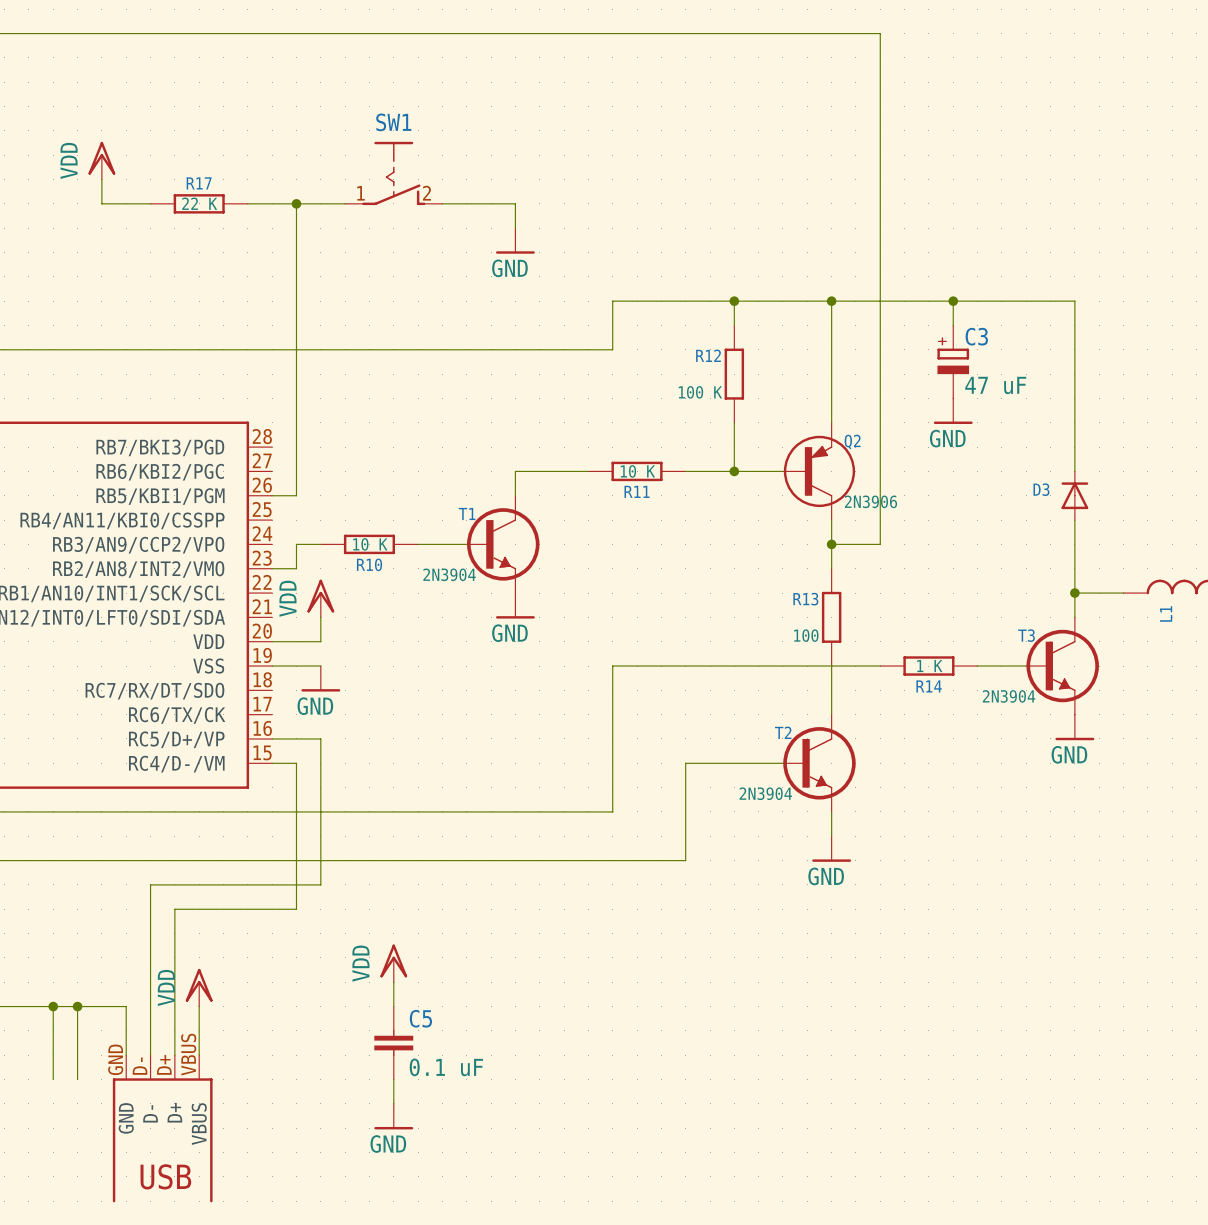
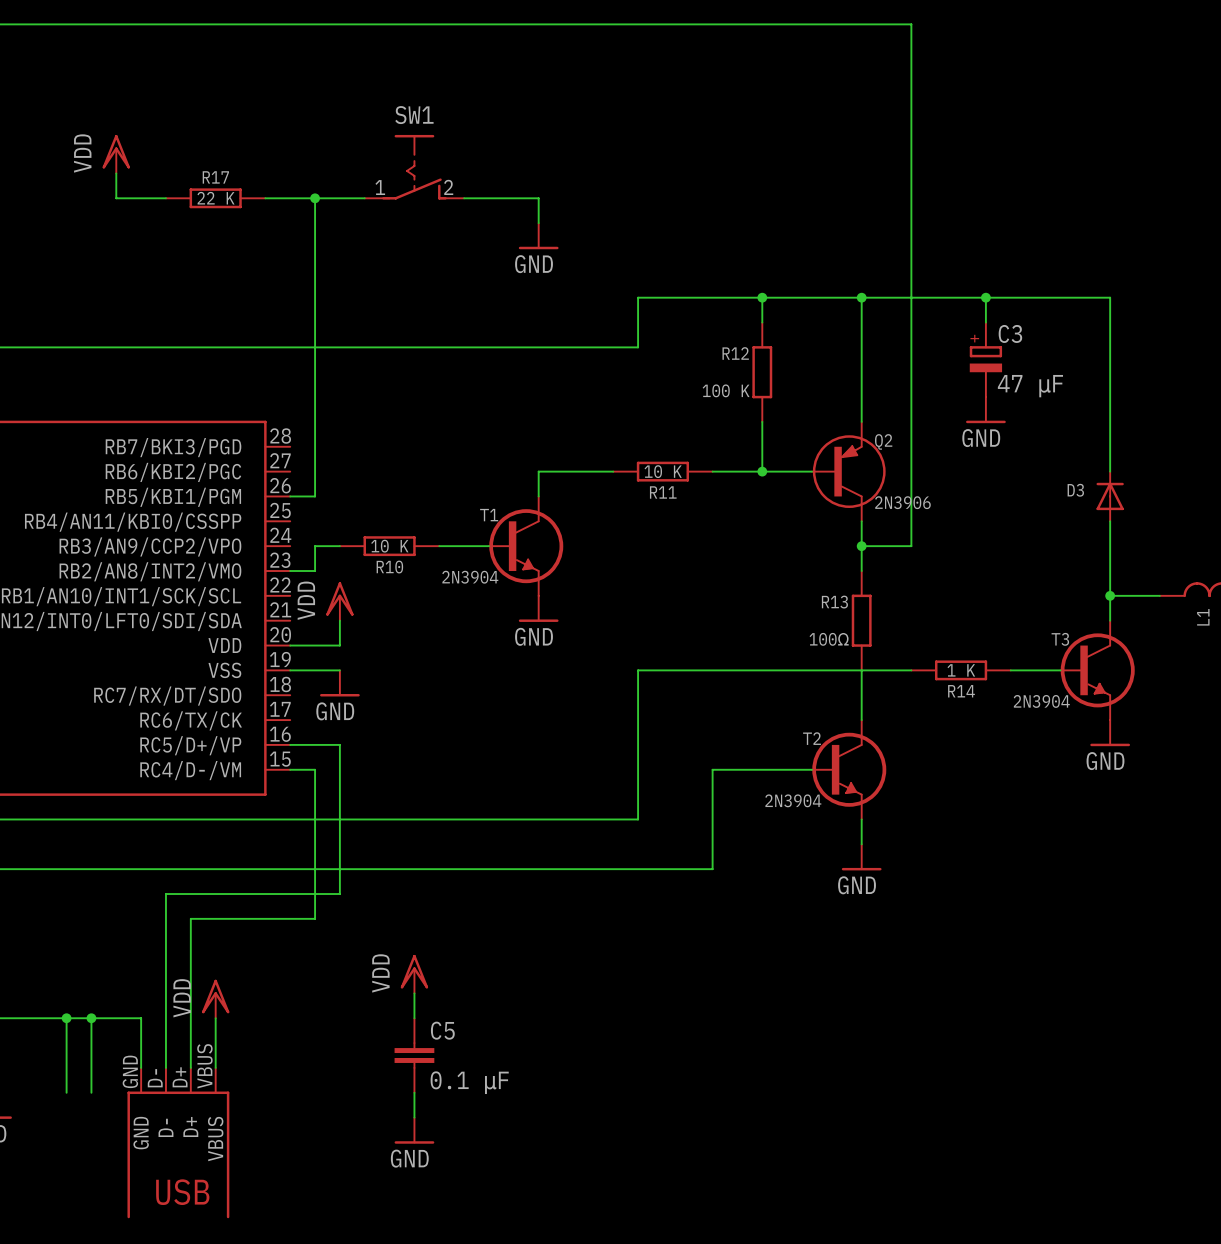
C3 value: 47 uF (995, 385) -> 47 μF (1030, 386)
R13 value: 100 (806, 635) -> 100Ω (829, 639)
C5 value: 0.1 uF (446, 1067) -> 0.1 μF (469, 1082)

